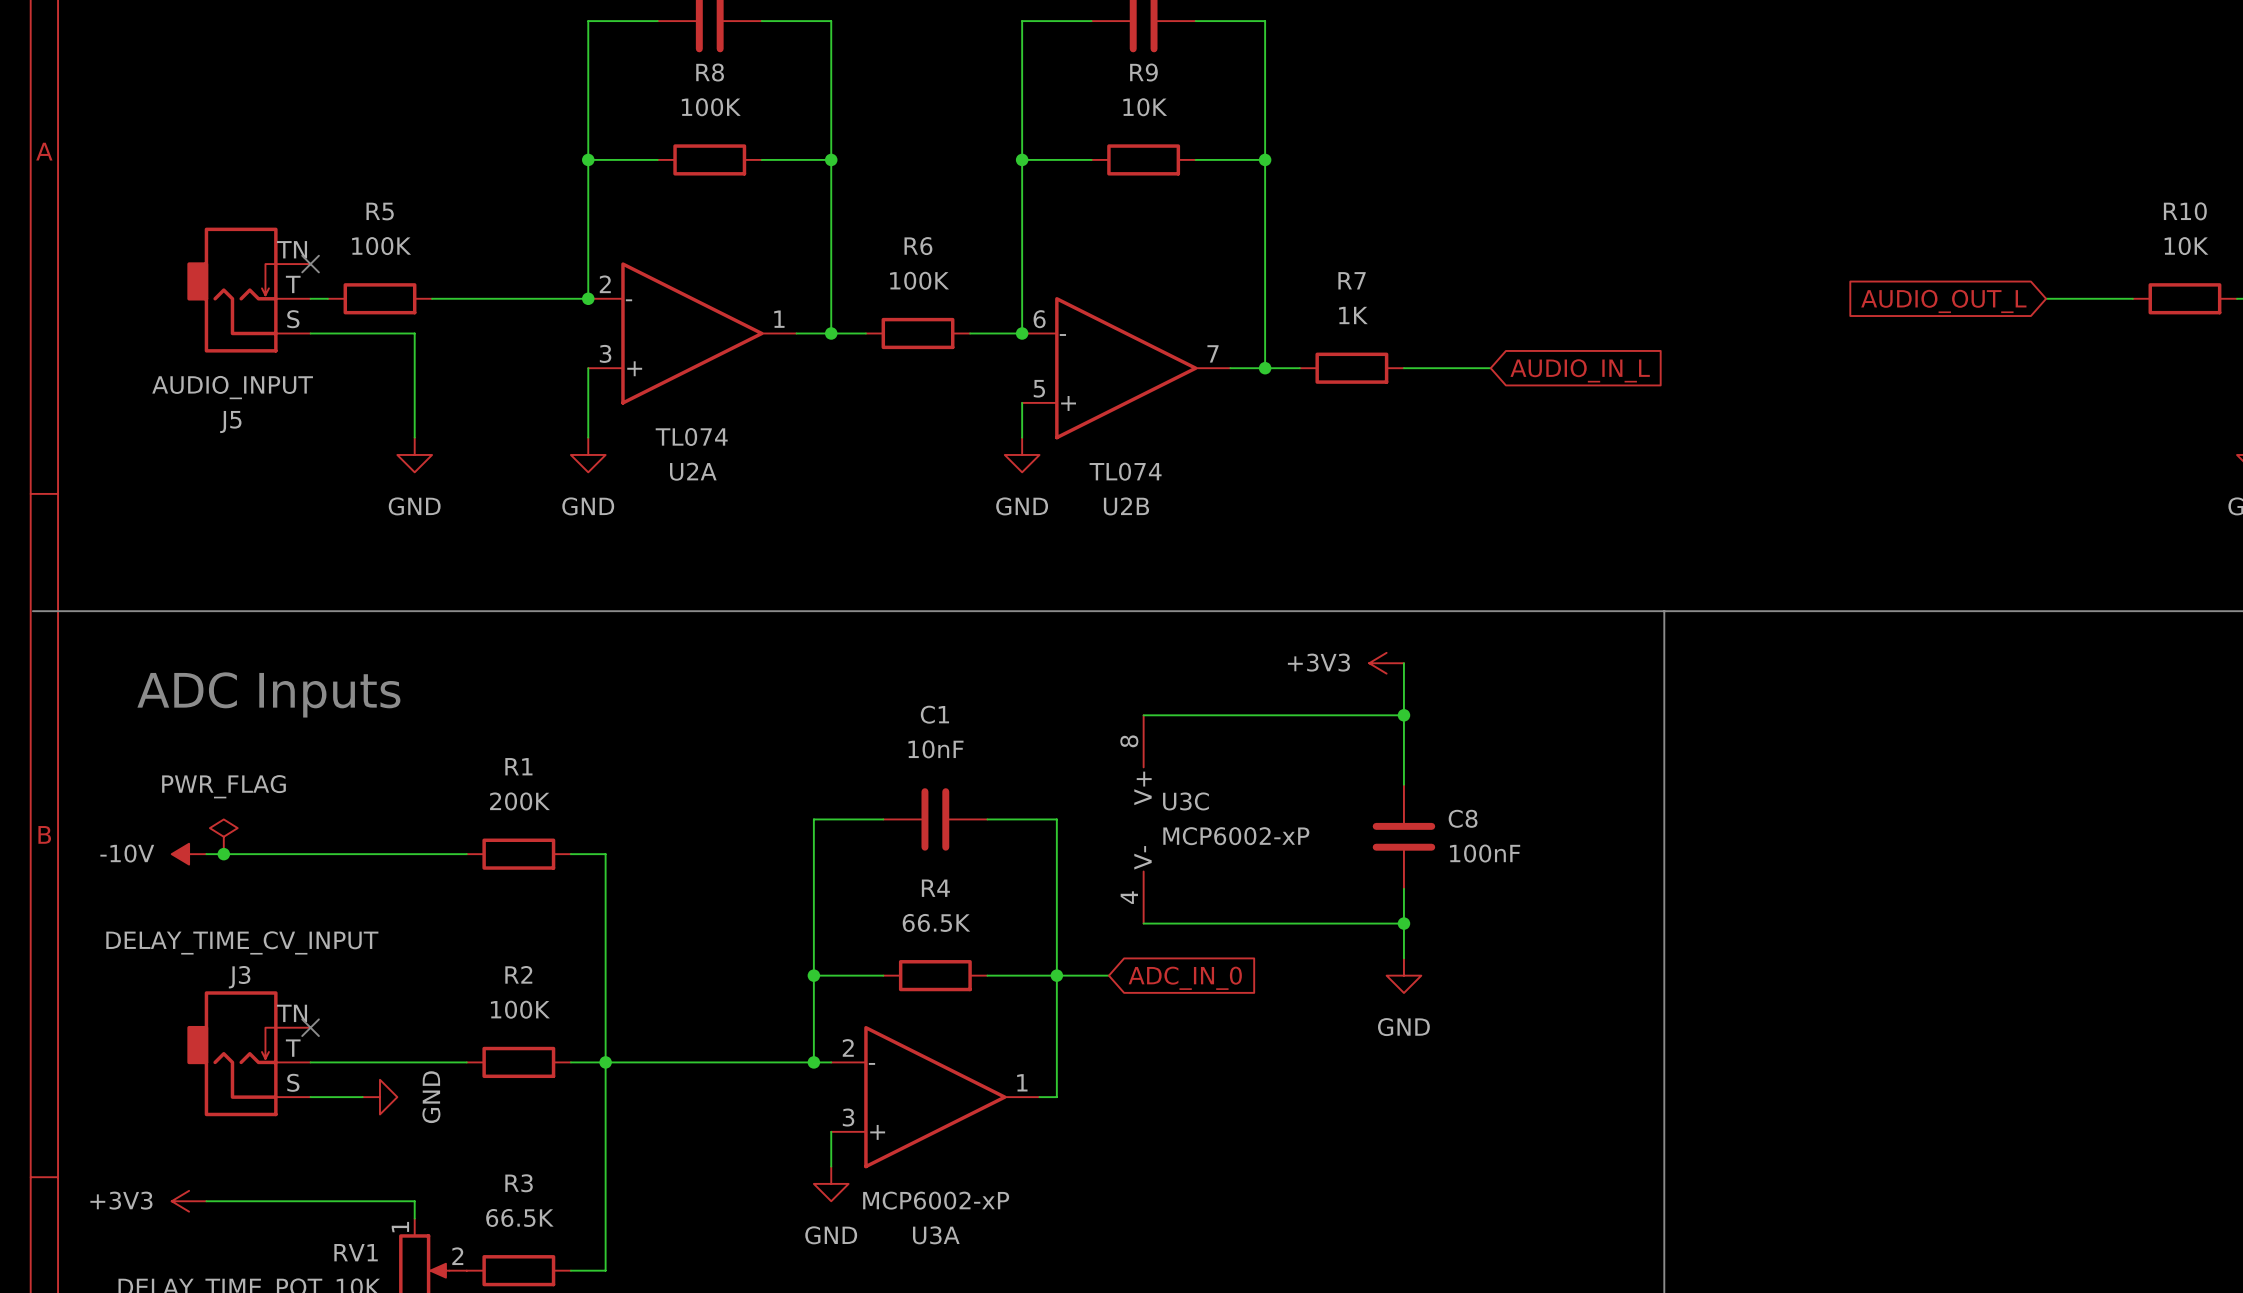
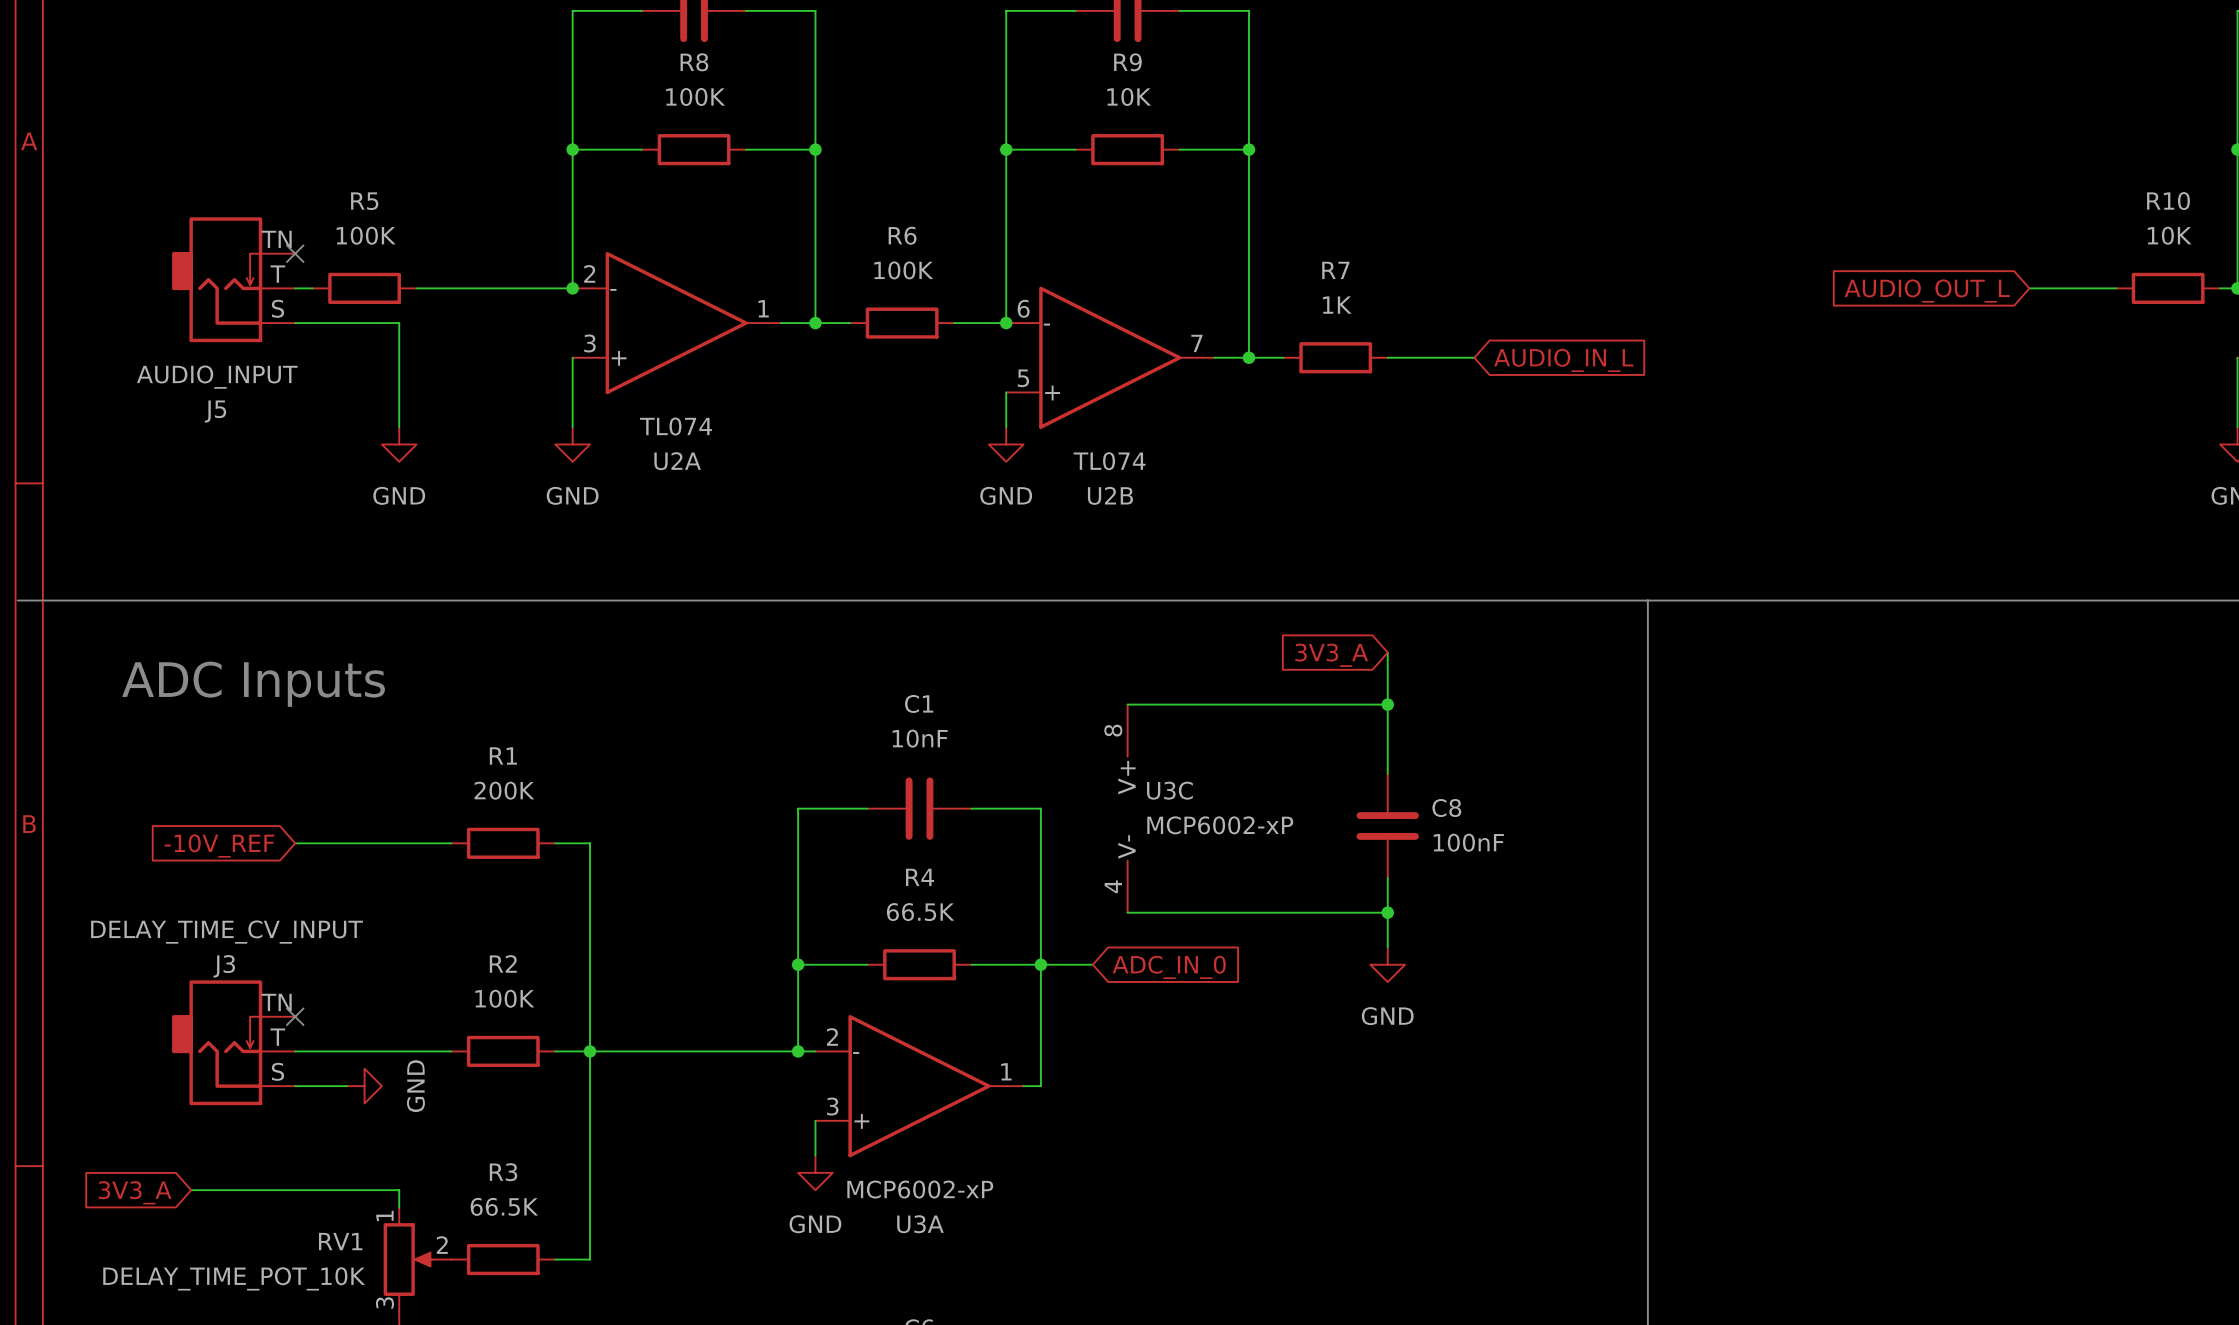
power symbol: +3V3 (1386, 663) -> none
global label: none -> 3V3_A (1331, 655)
power symbol: PWR_FLAG (223, 836) -> none
power symbol: -10V (189, 854) -> none
wire: (206, 854) (310, 854) -> none
junction: (223, 854) -> none
global label: none -> -10V_REF (219, 845)
power symbol: +3V3 (189, 1201) -> none
global label: none -> 3V3_A (135, 1192)

